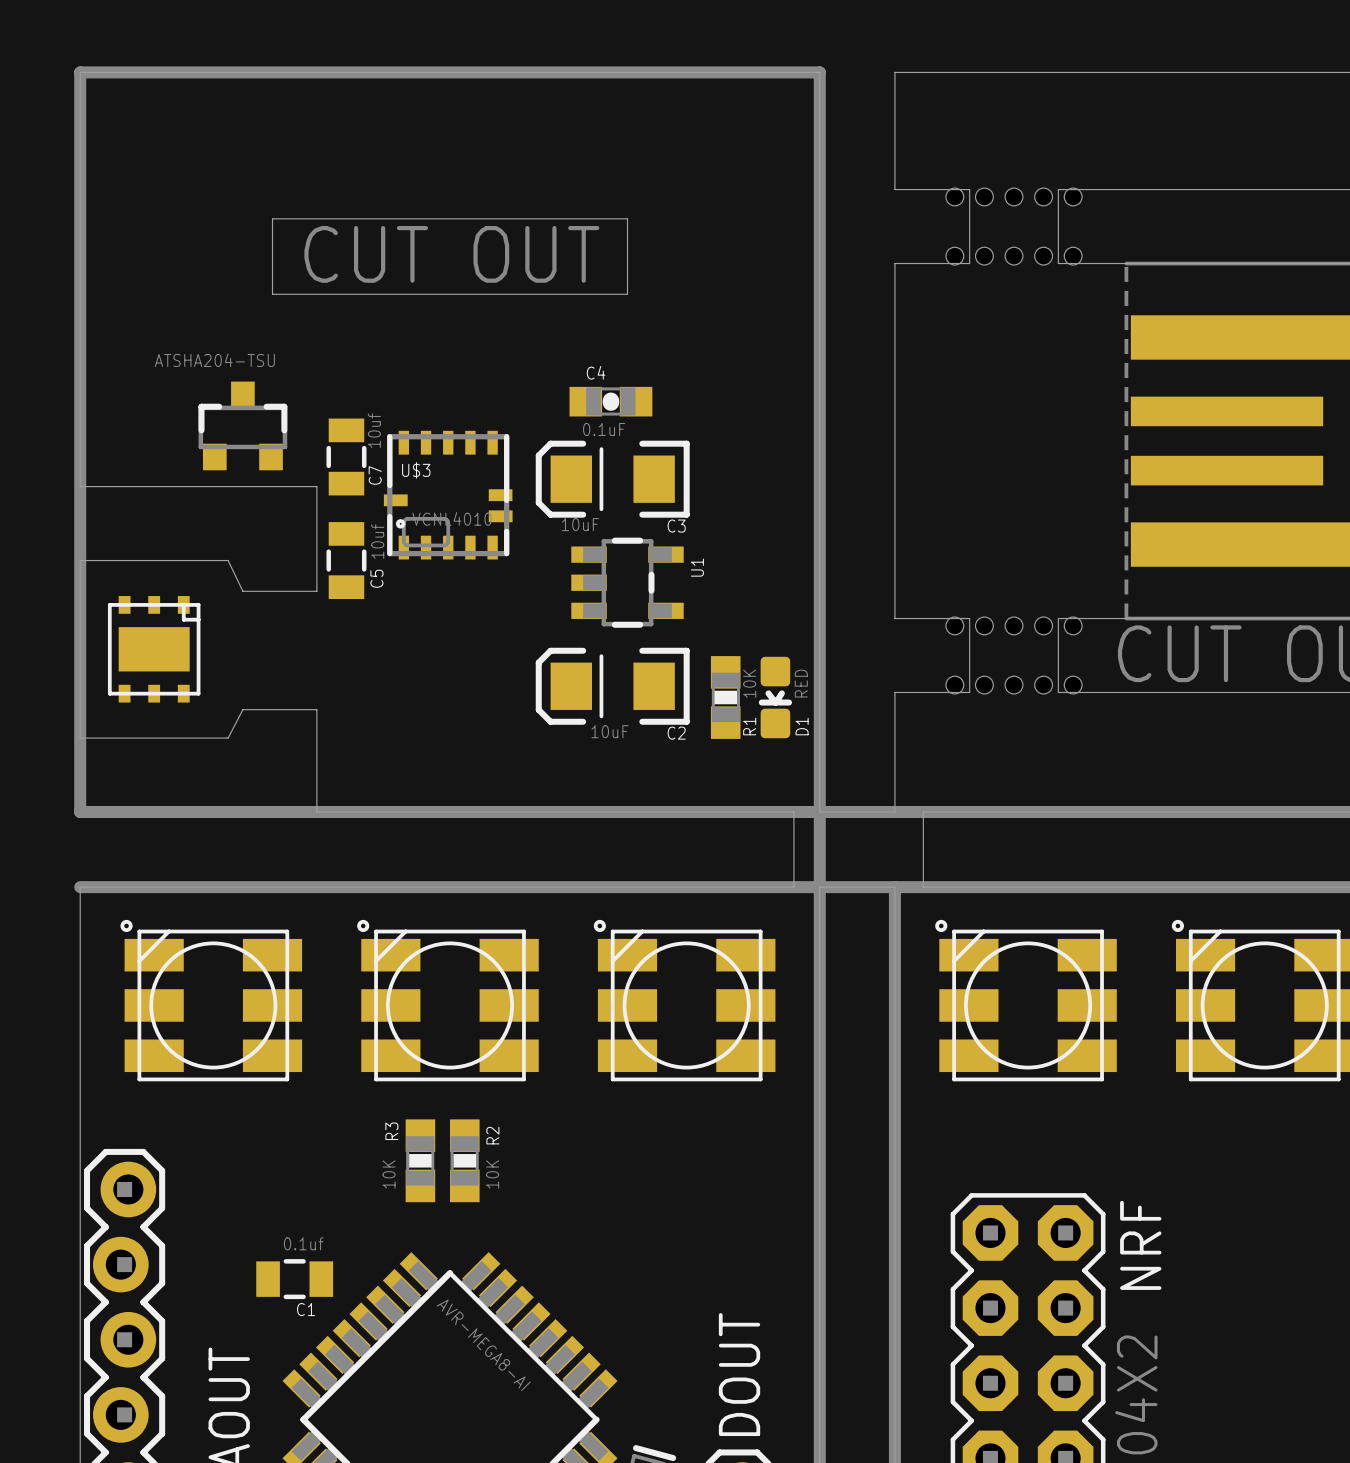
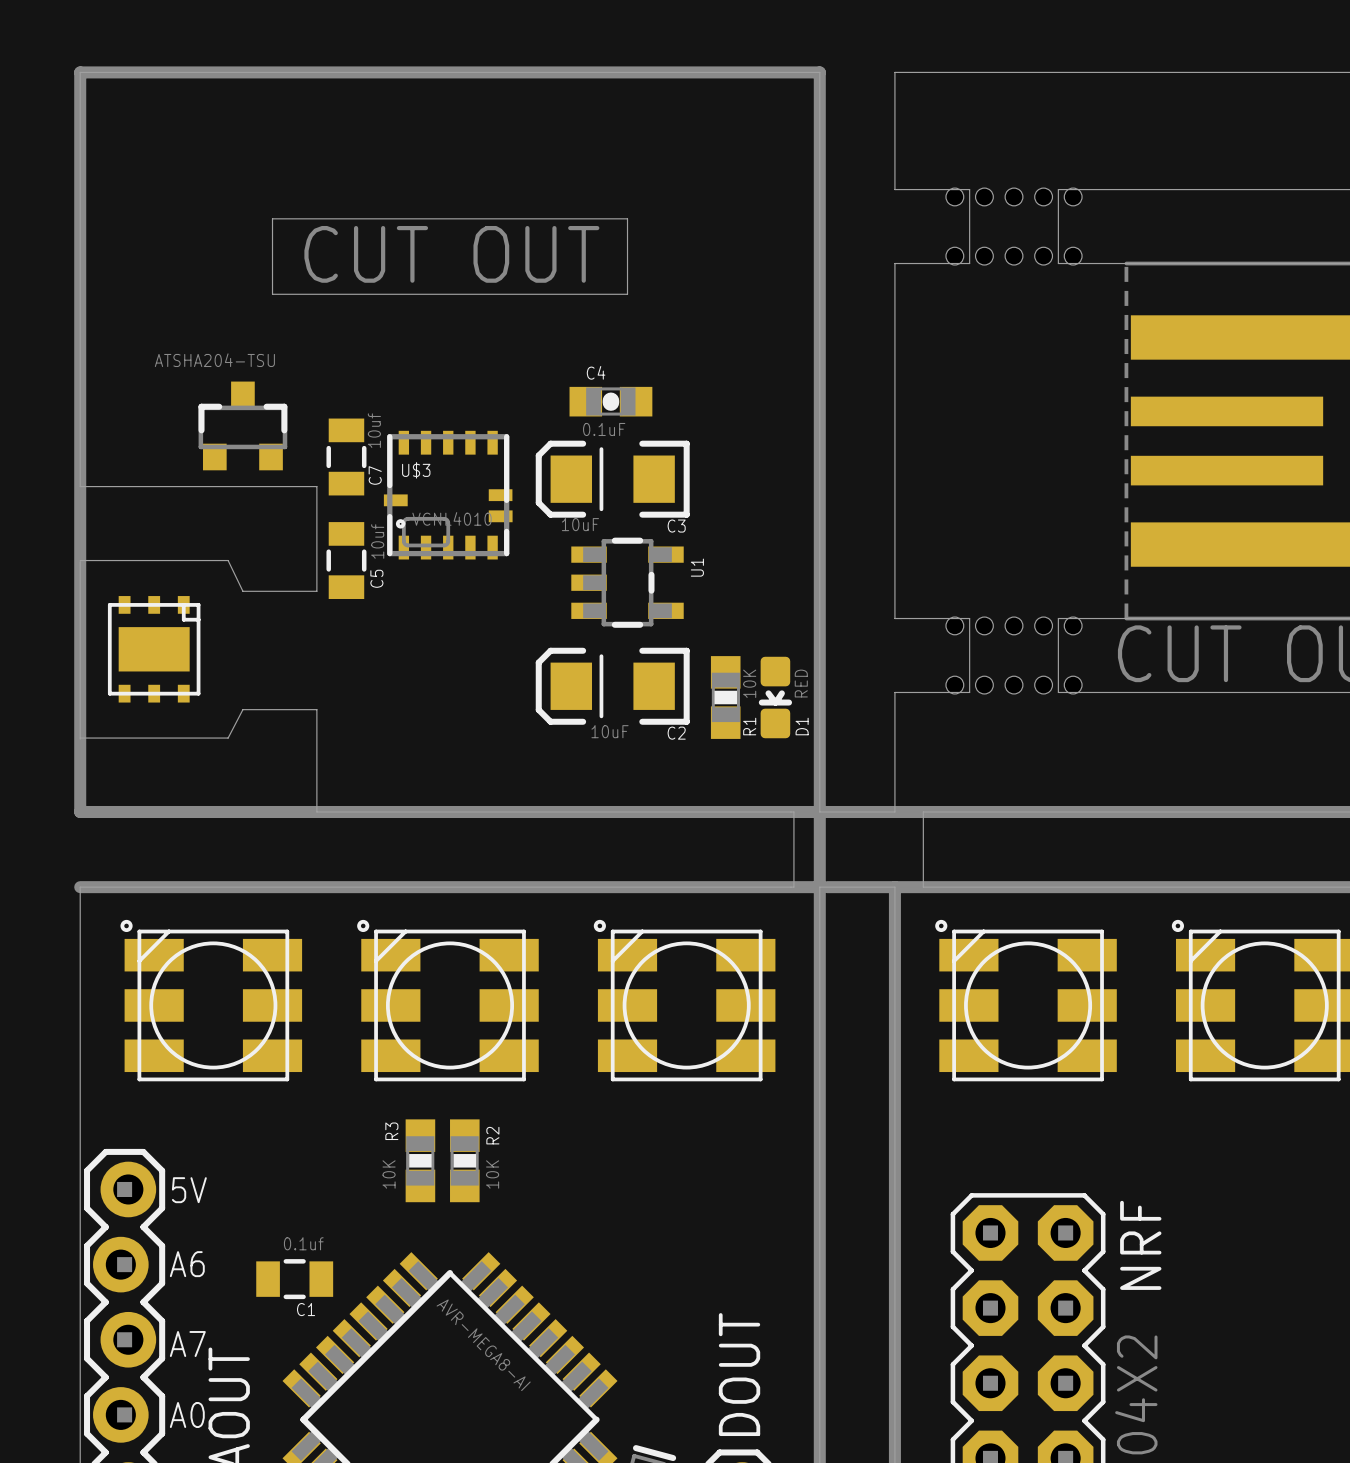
text: none -> 5V (189, 1190)
text: none -> A6 (187, 1264)
text: none -> A7 (187, 1344)
text: none -> A0 (187, 1415)

